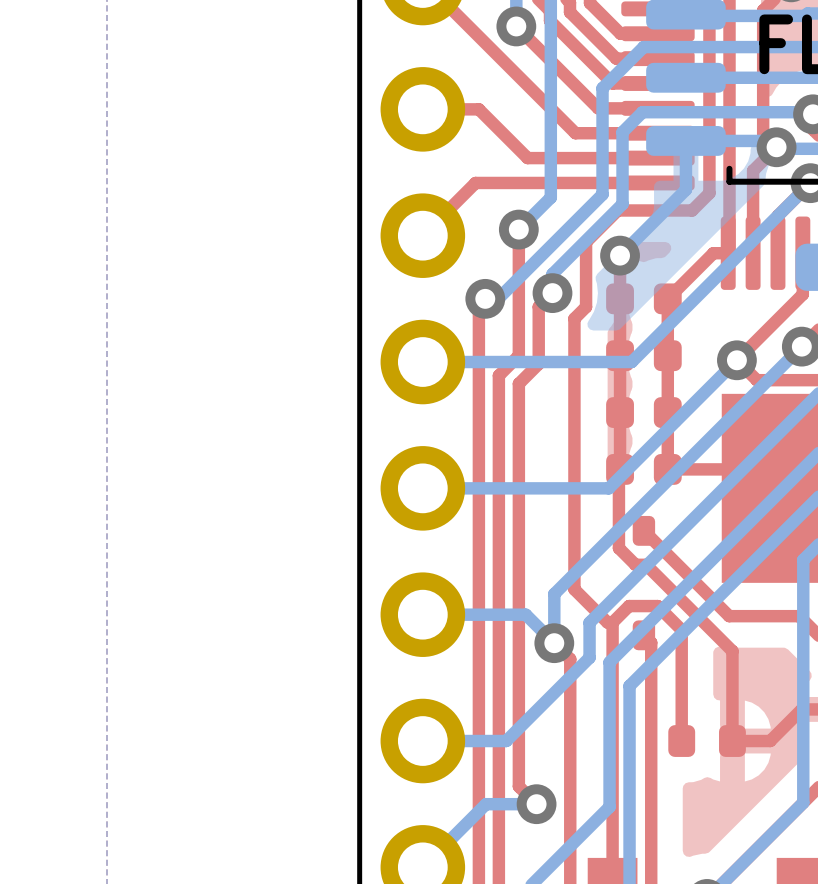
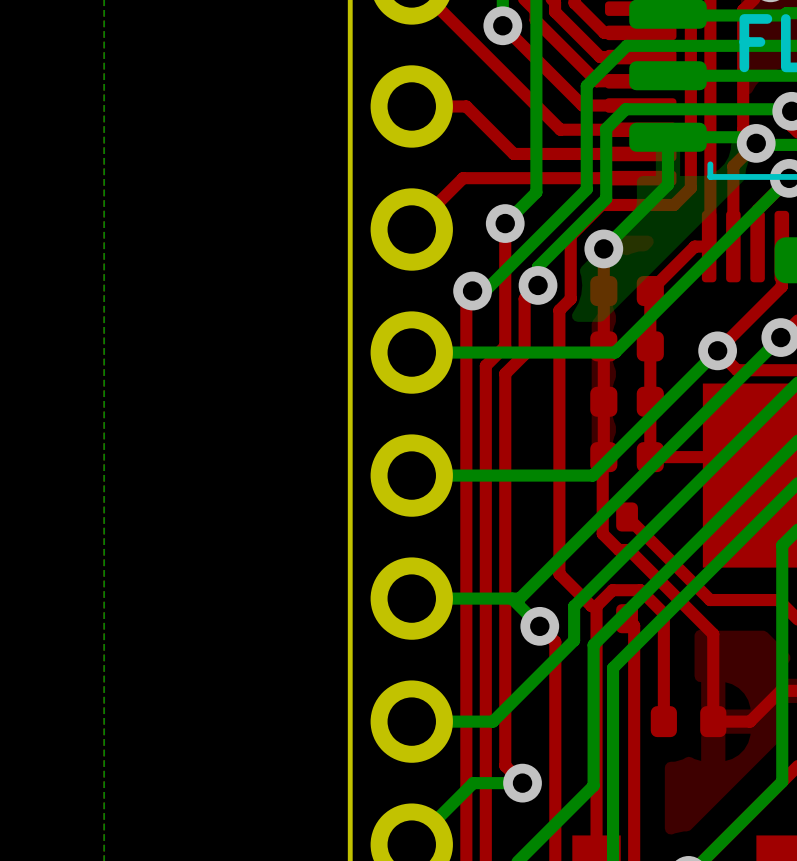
bottom track: (554, 594) (554, 643) -> (539, 578) (519, 598) (512, 598)

